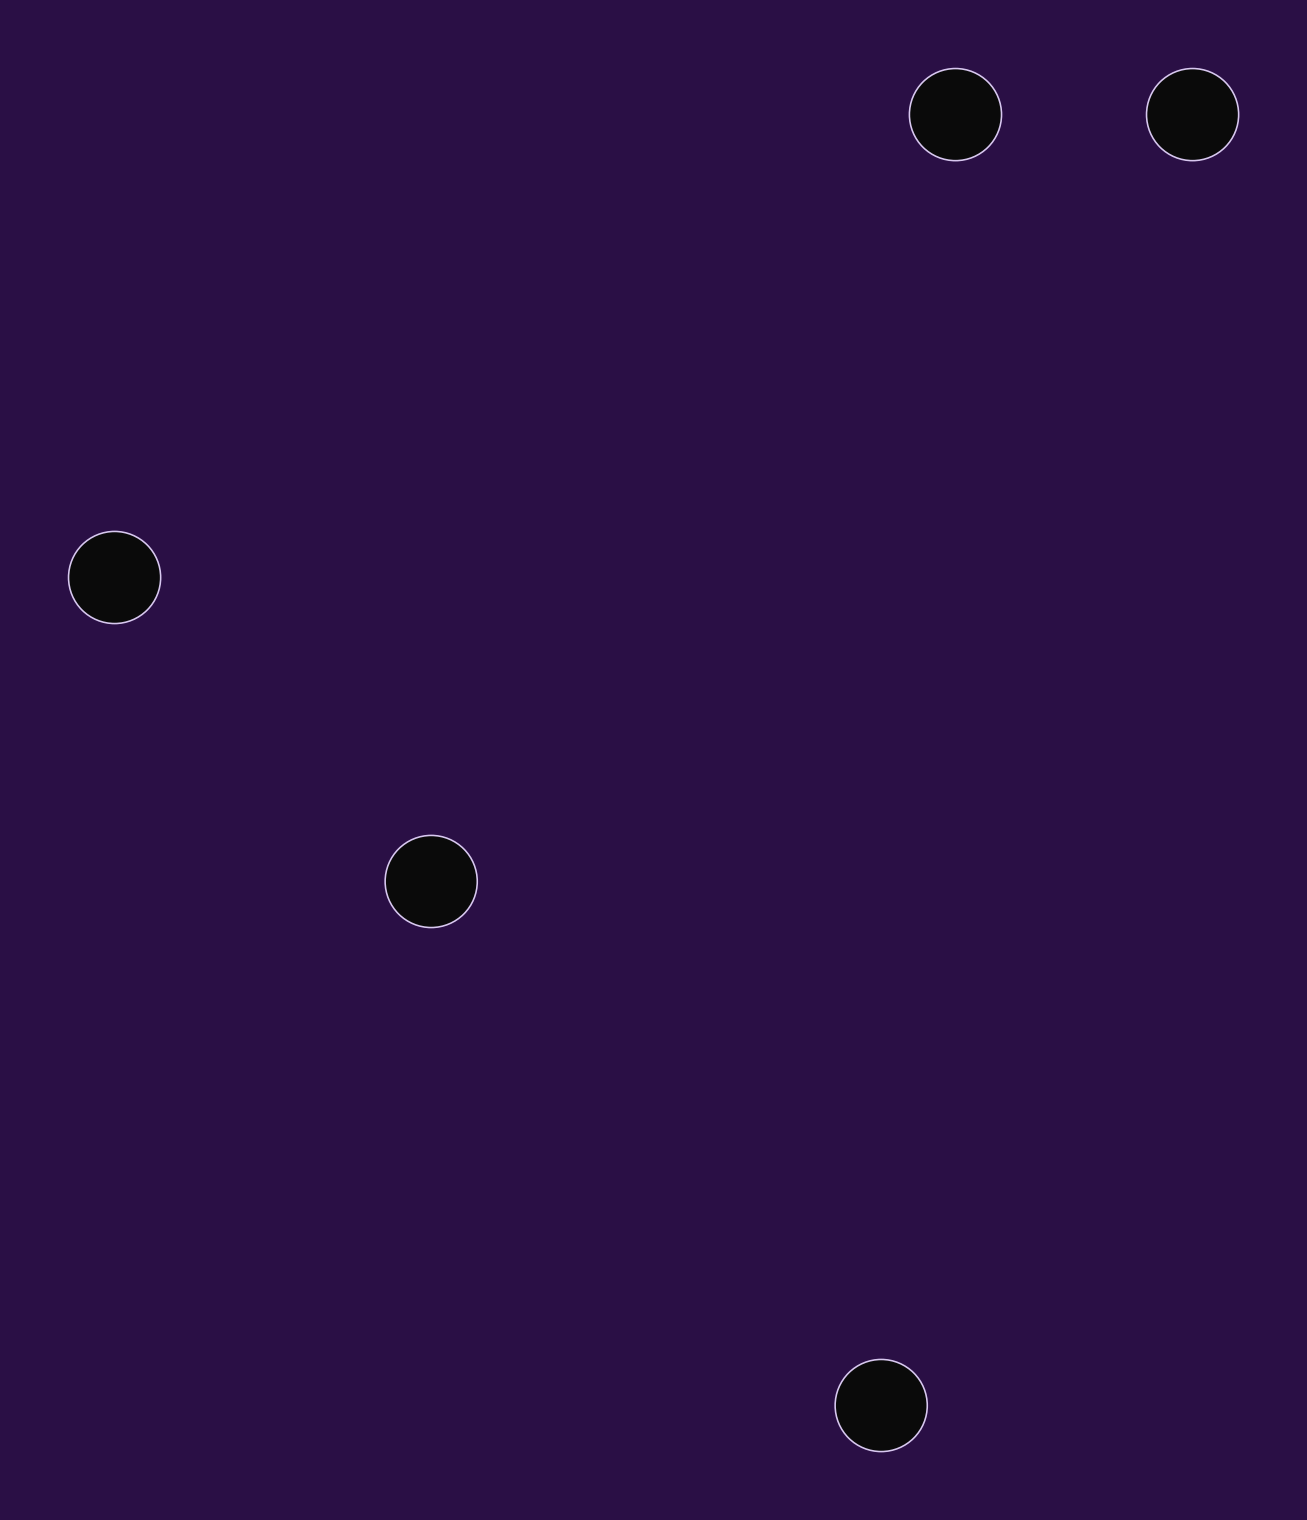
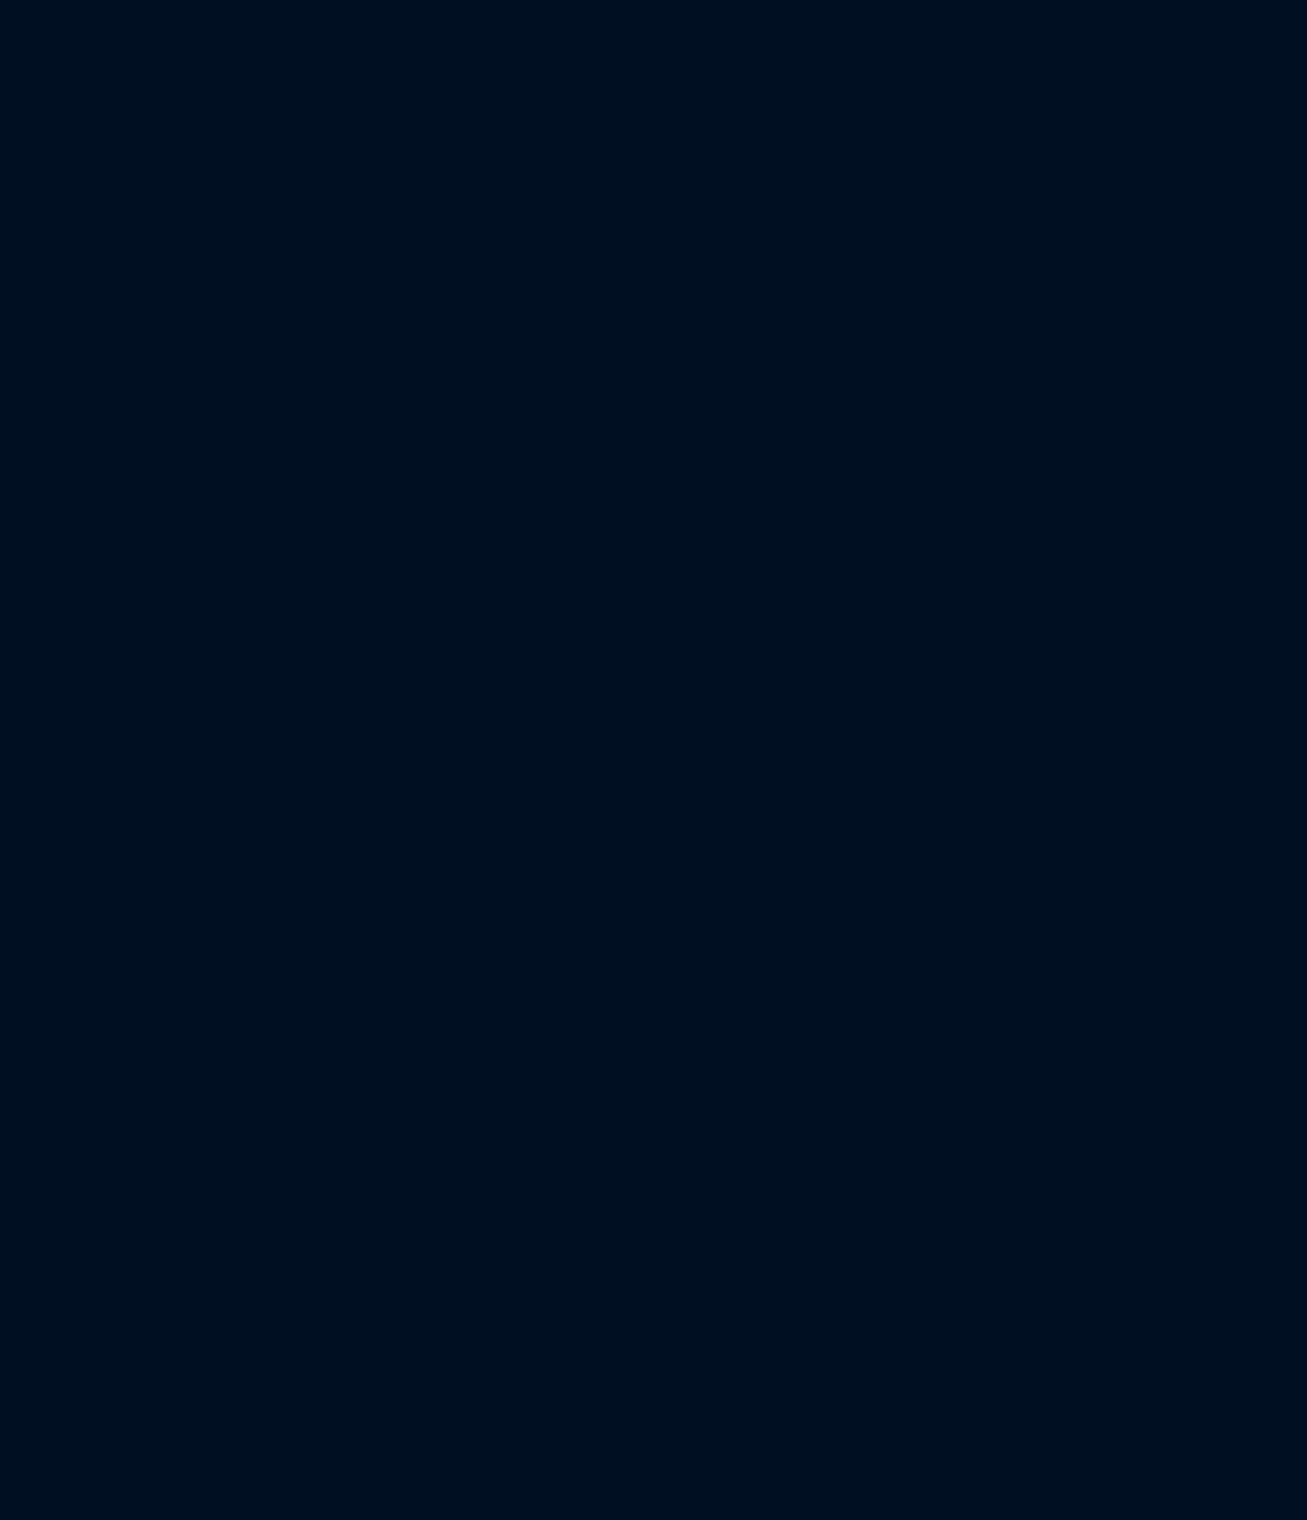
part: (955, 114) -> none
part: (1192, 114) -> none
part: (114, 577) -> none
part: (431, 881) -> none
part: (881, 1405) -> none

